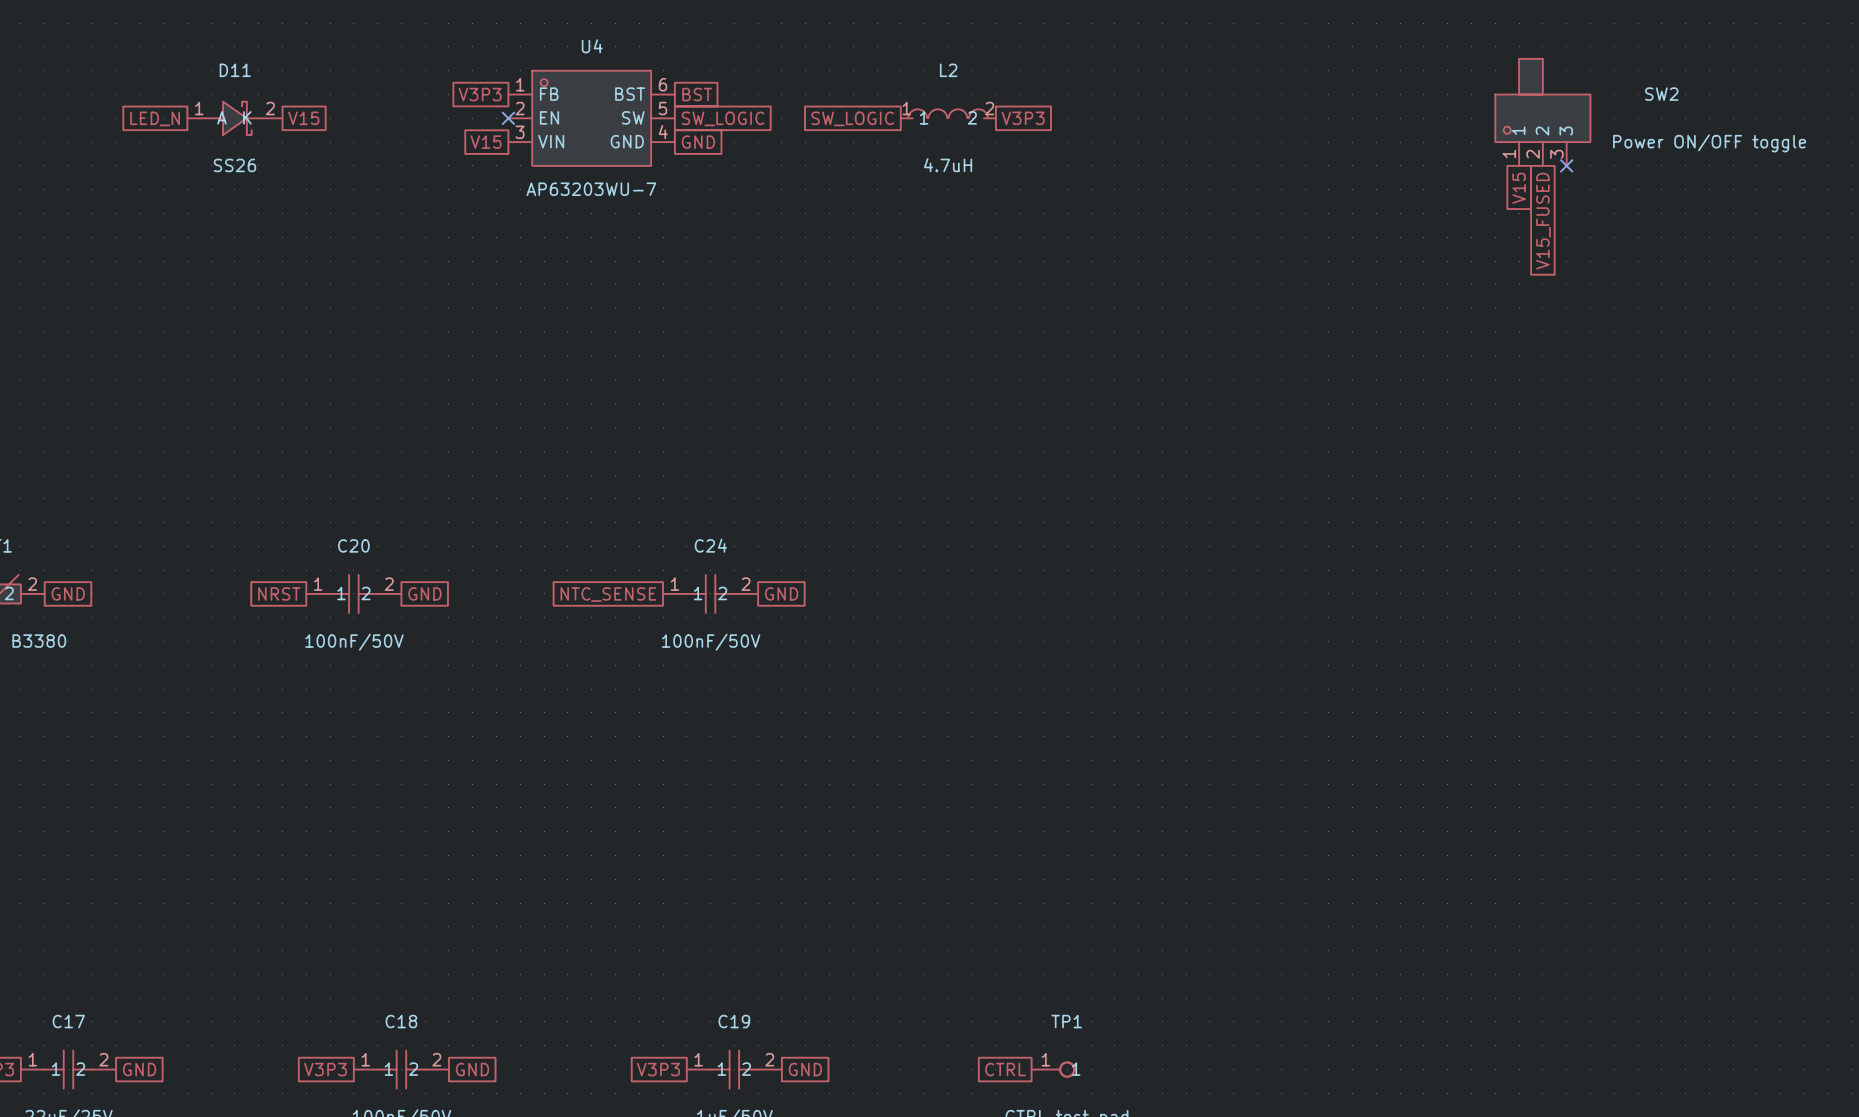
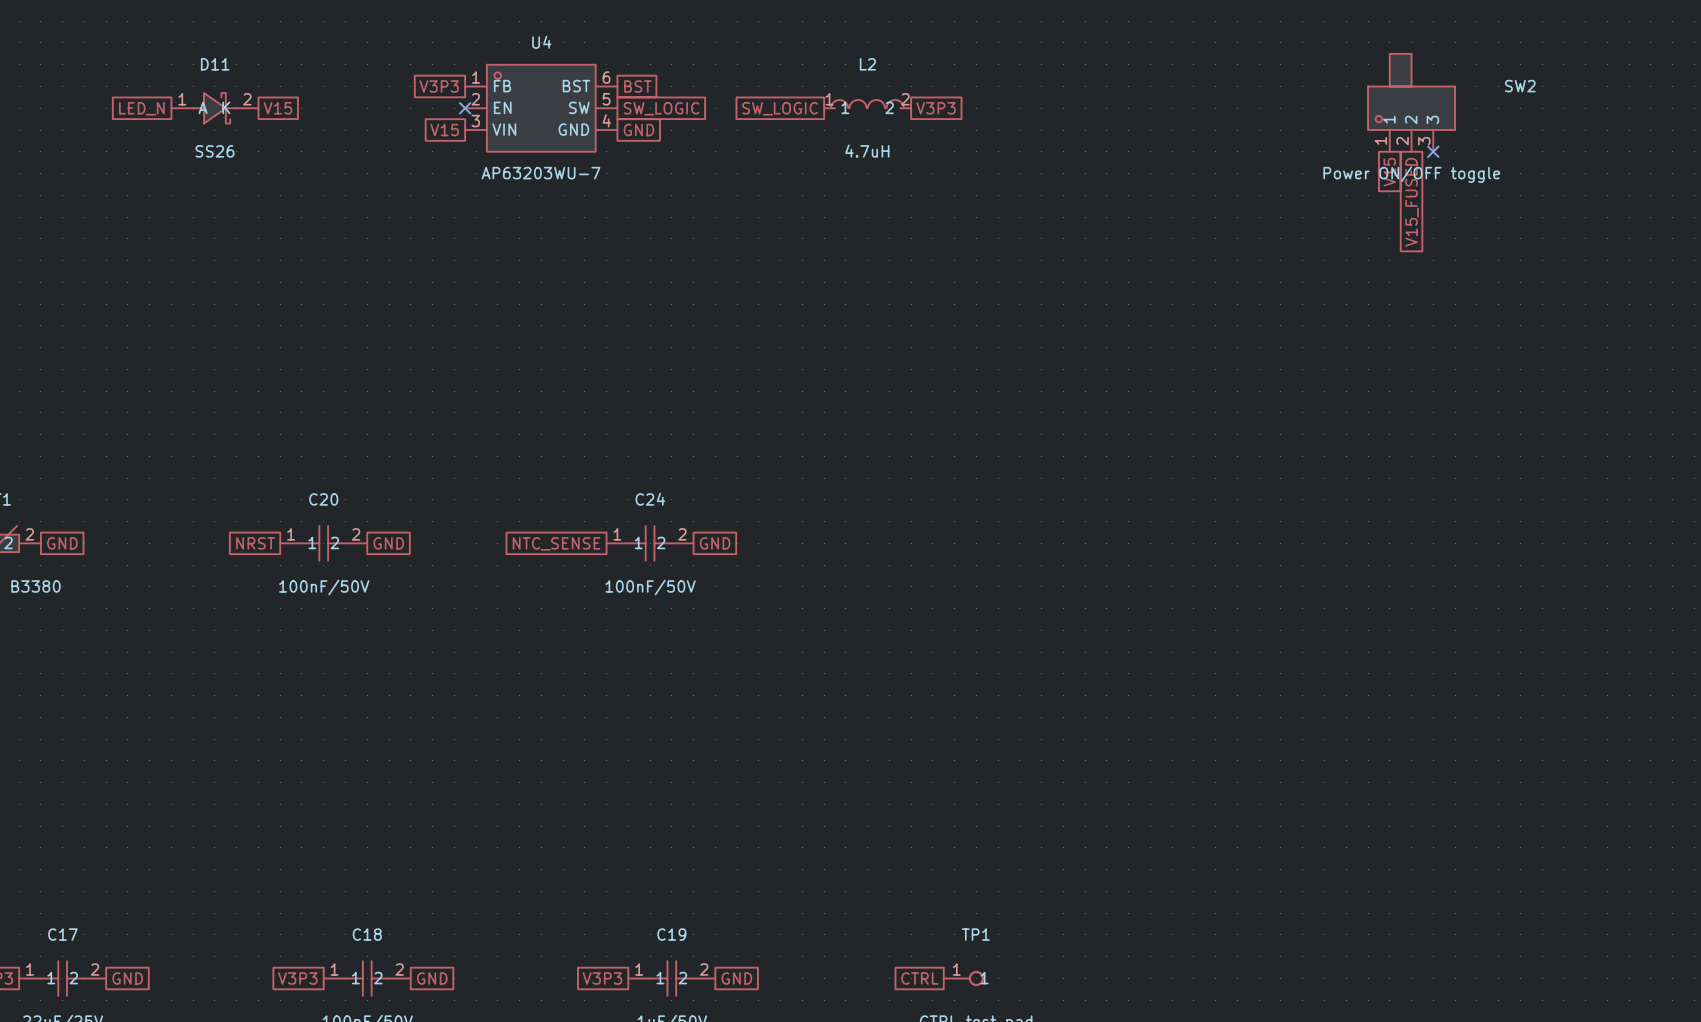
SW2 value position: Power ON/OFF toggle (1709, 143) -> Power ON/OFF toggle (1411, 174)

